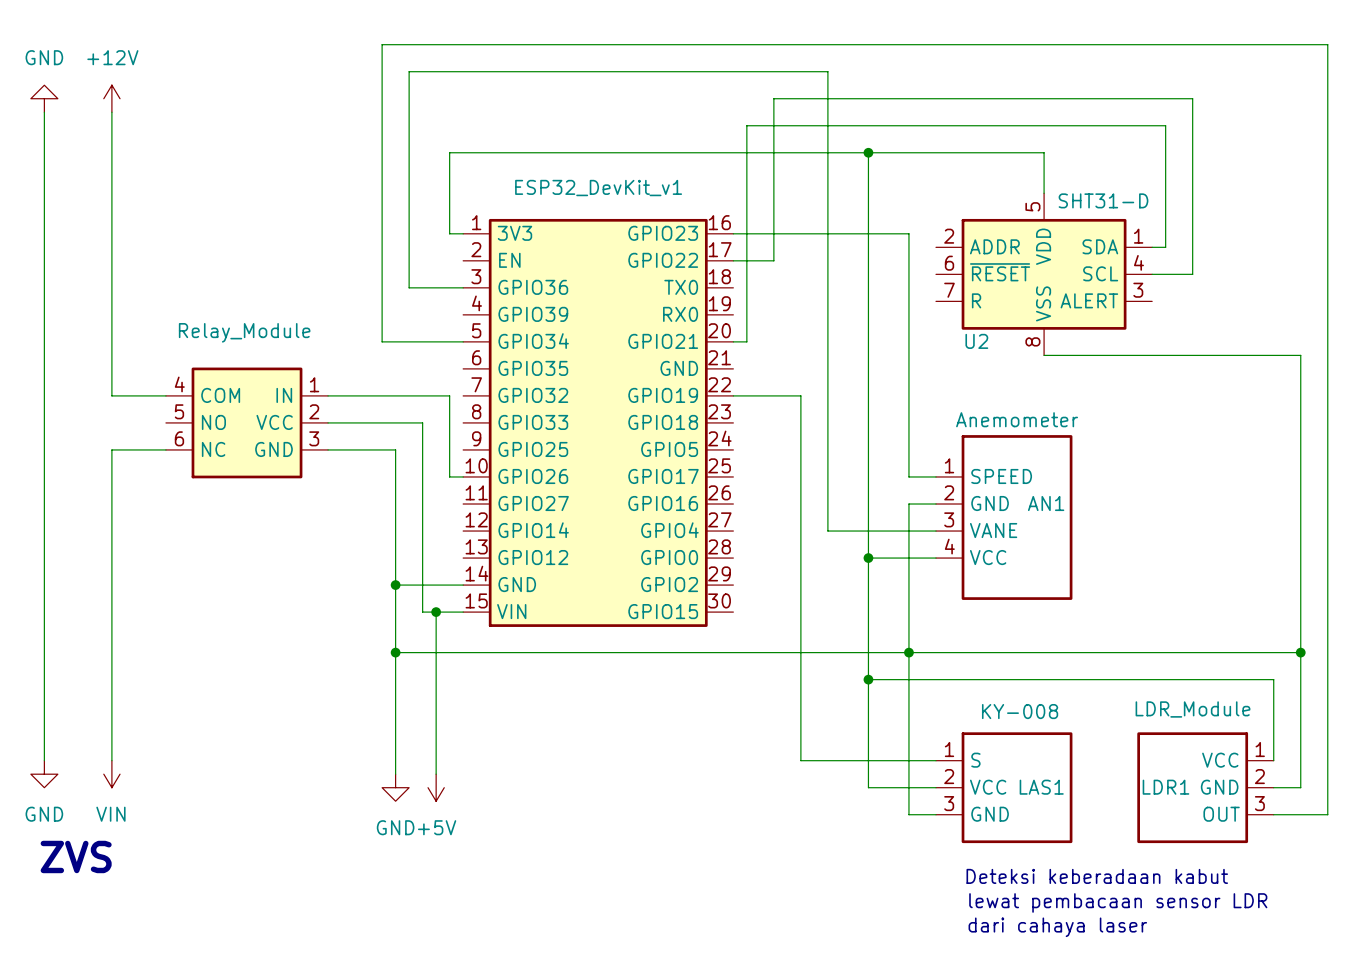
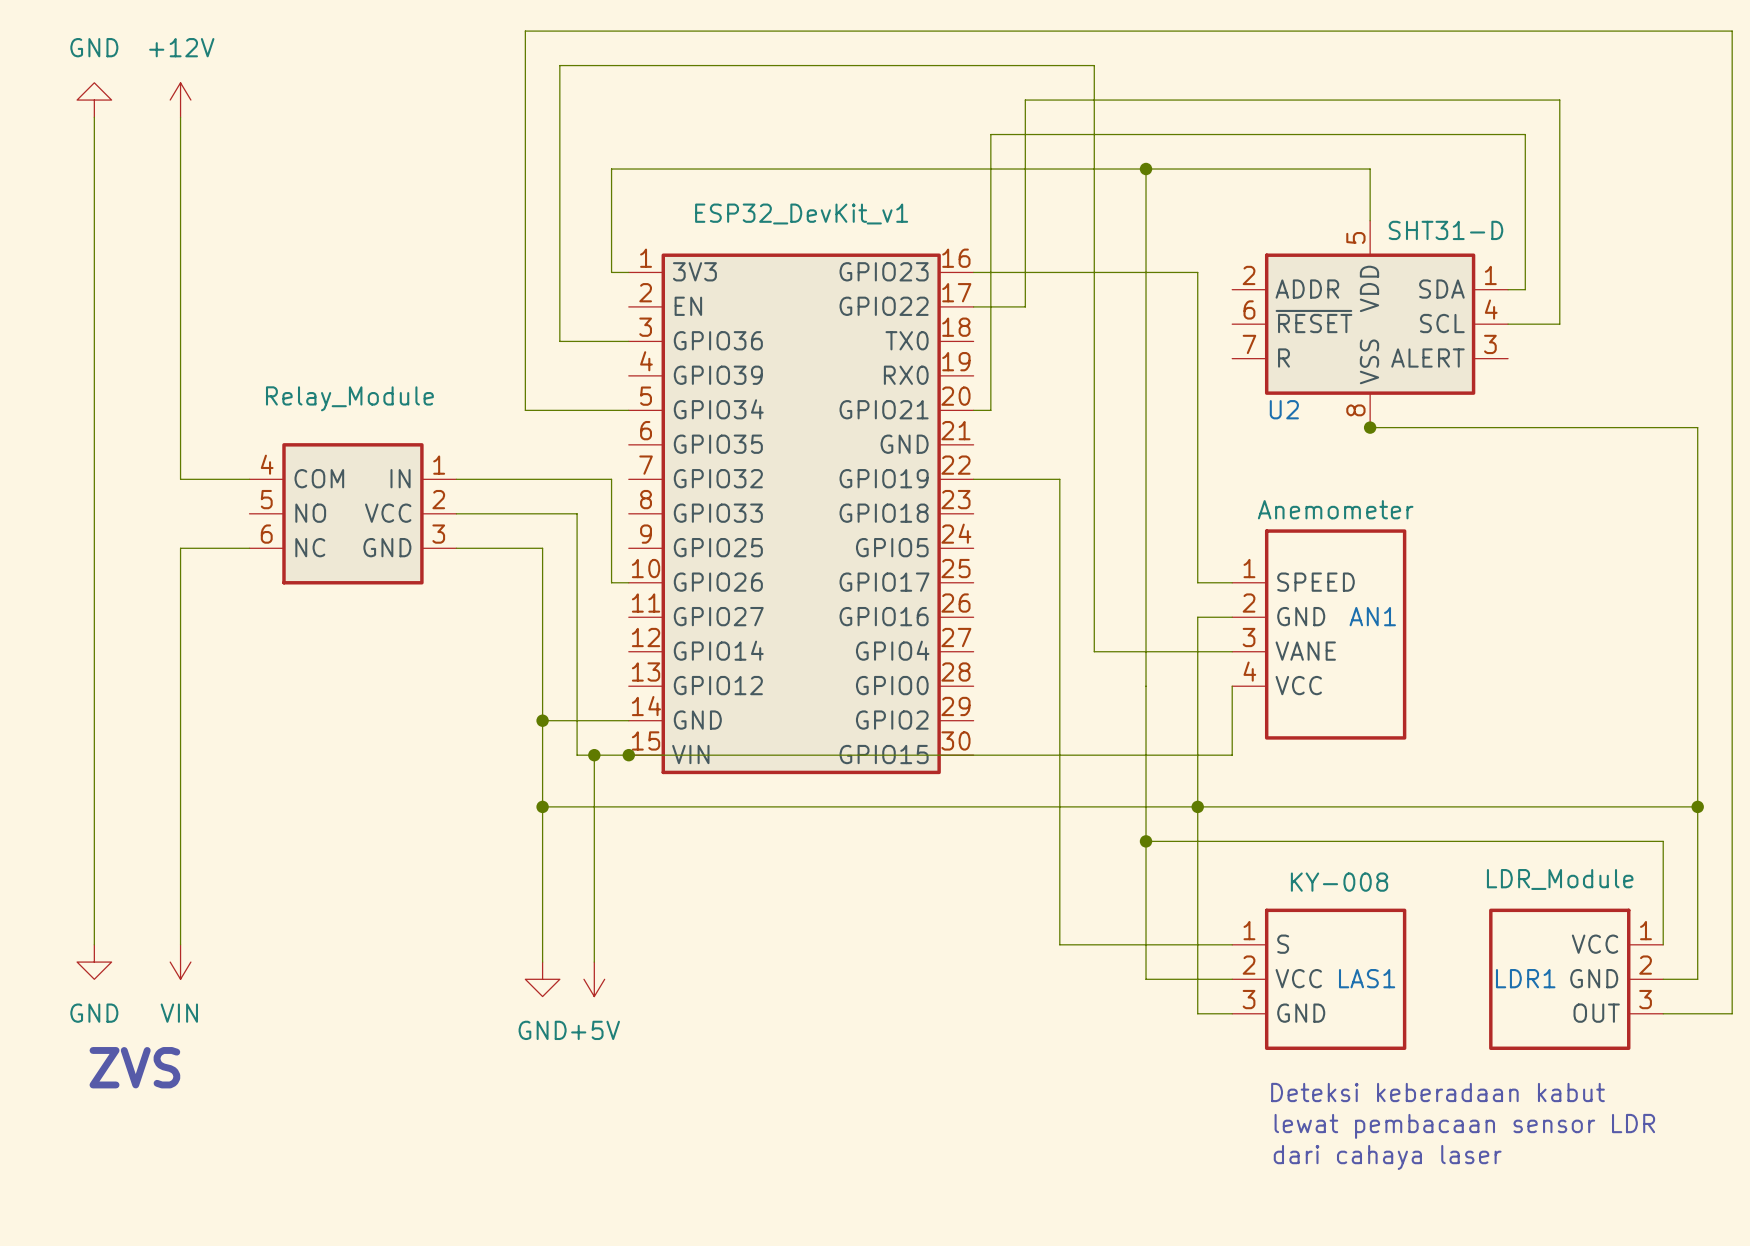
junction: none -> (1370, 427)
wire: (868, 558) (935, 558) -> (628, 755) (1232, 755) (1232, 686)
junction: (868, 558) -> none
junction: none -> (628, 755)

